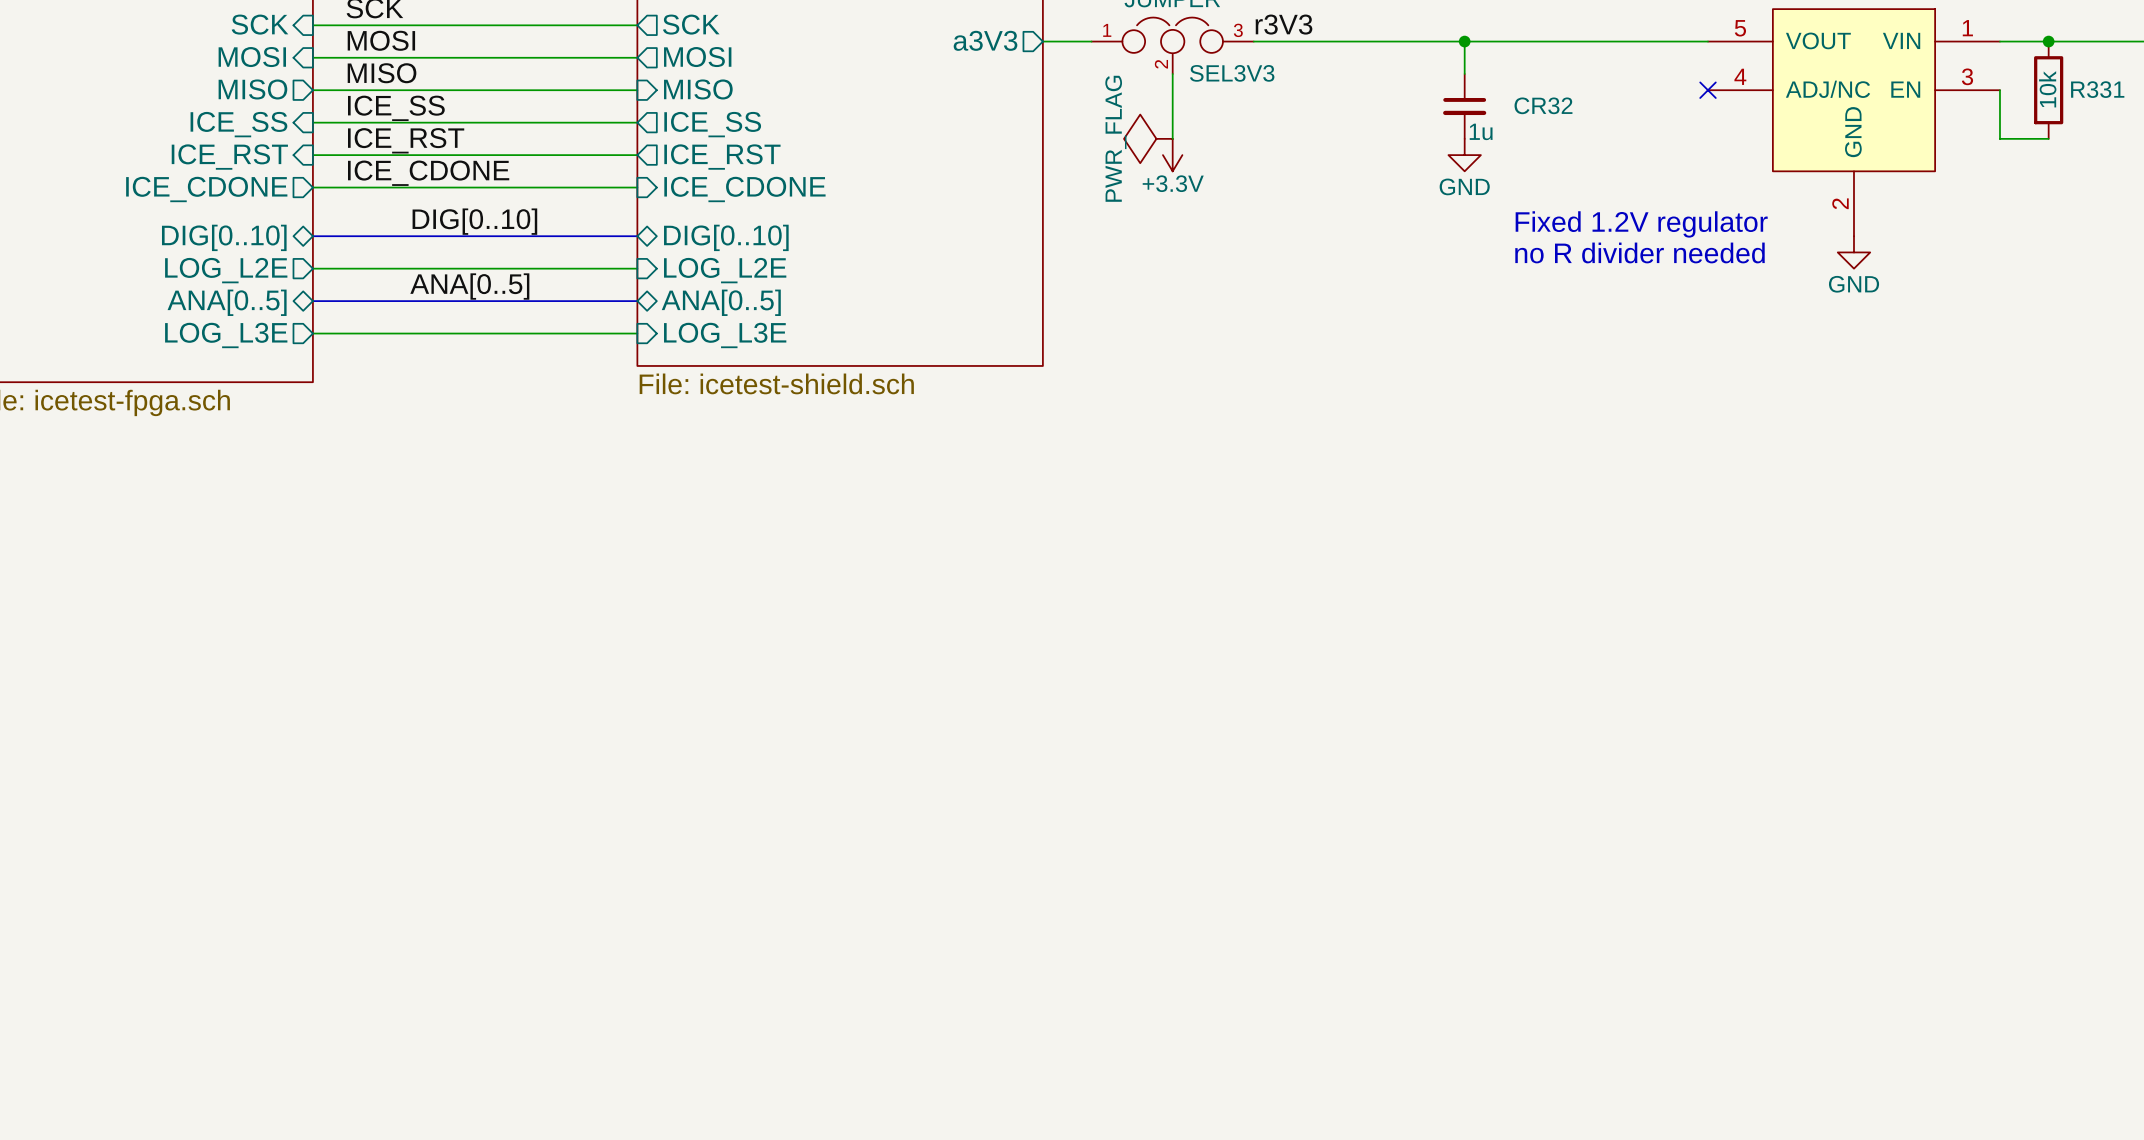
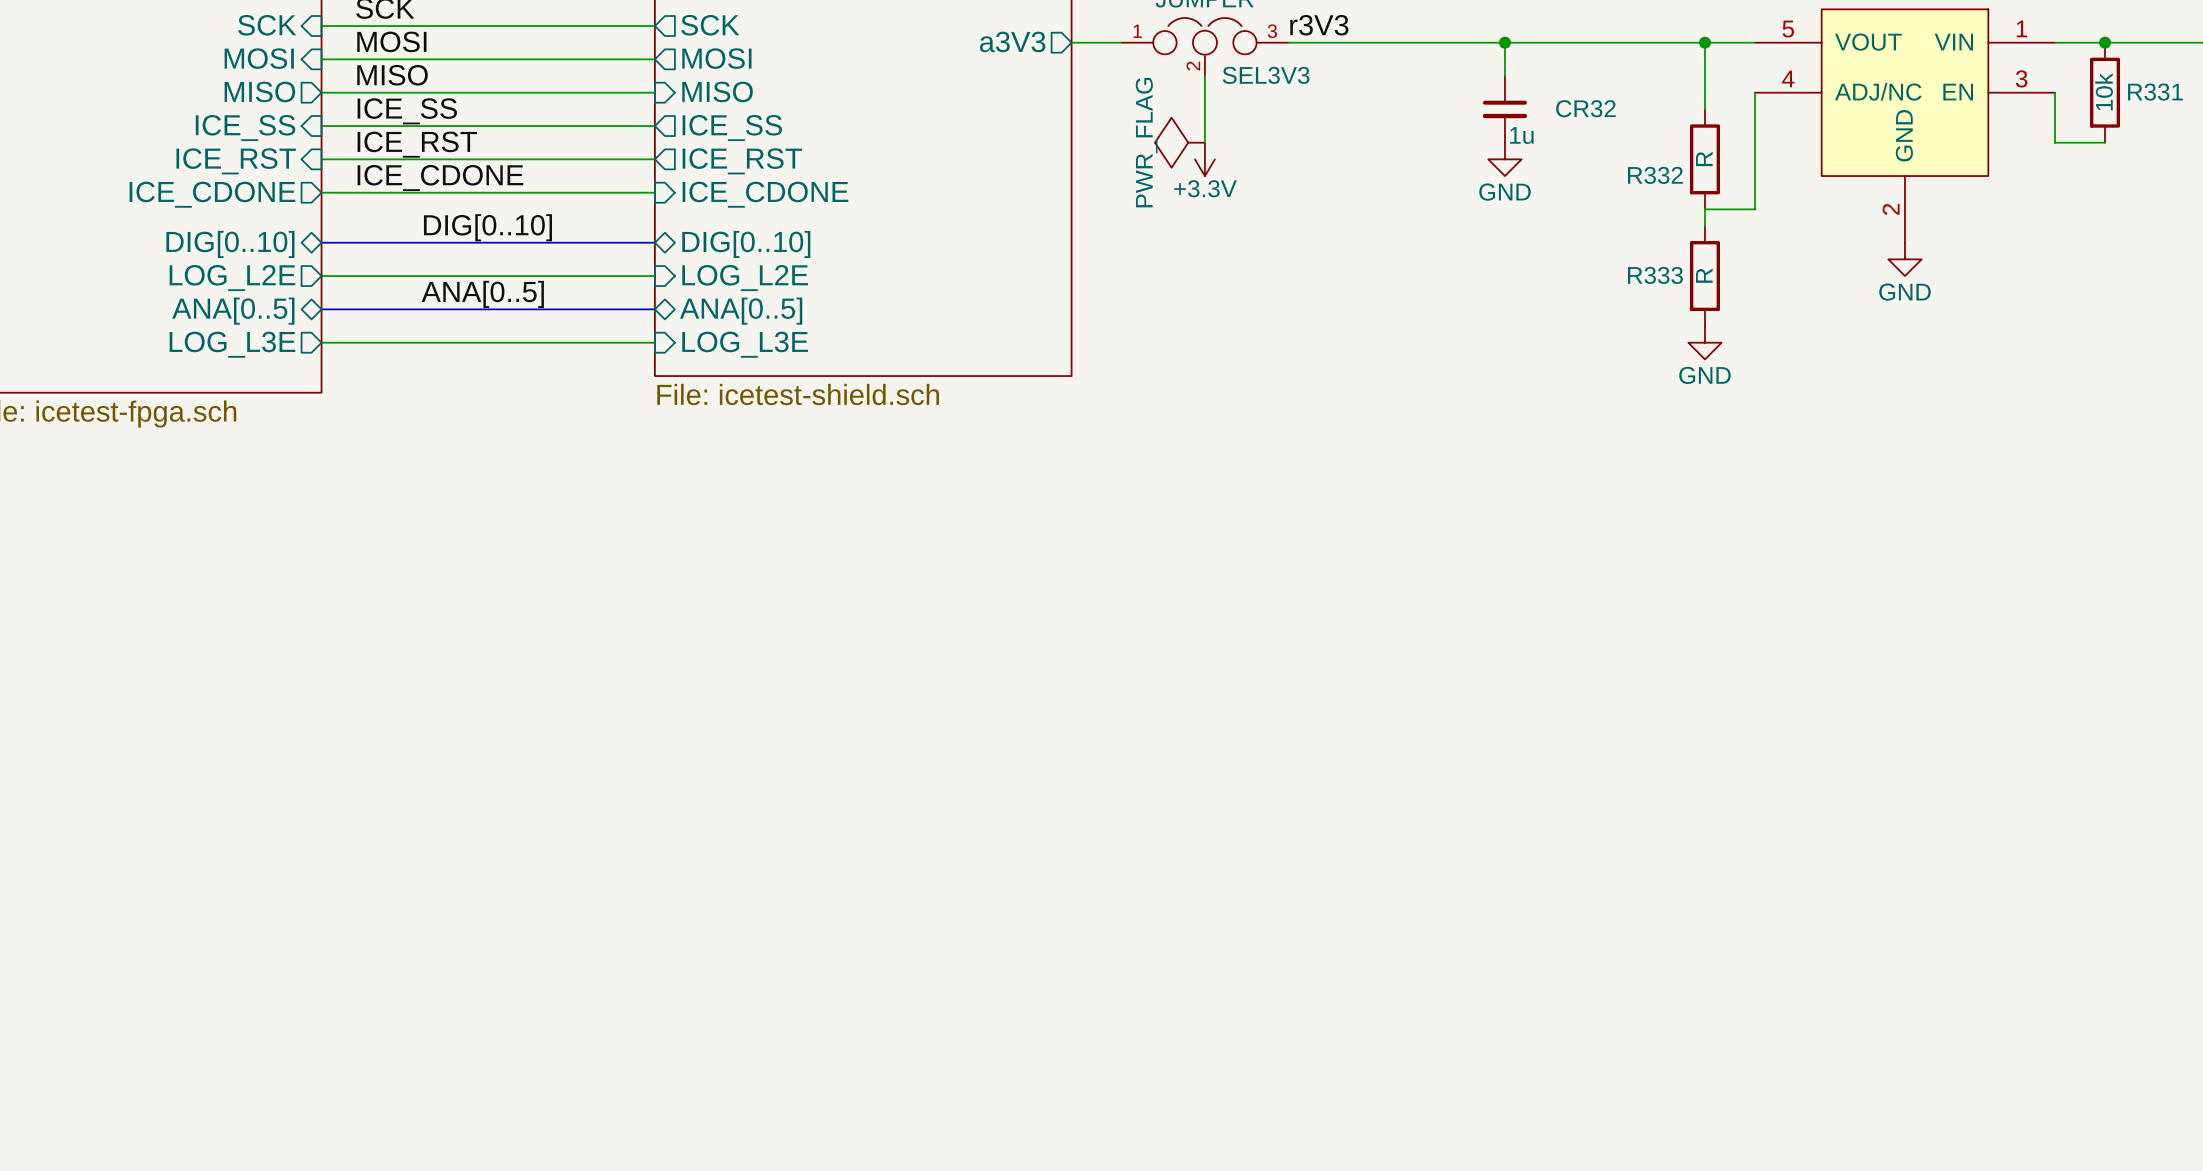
wire: none -> (1704, 42) (1704, 109)
junction: none -> (1704, 42)
wire: none -> (1754, 92) (1754, 209) (1704, 209) (1704, 226)
no-connect mark: (1708, 90) -> none
R332: none -> R (1704, 159)
text: Fixed 1.2V regulator (1641, 224) -> none
text: no R divider needed (1640, 252) -> none
R333: none -> R (1704, 276)
power symbol: none -> GND (1704, 342)

